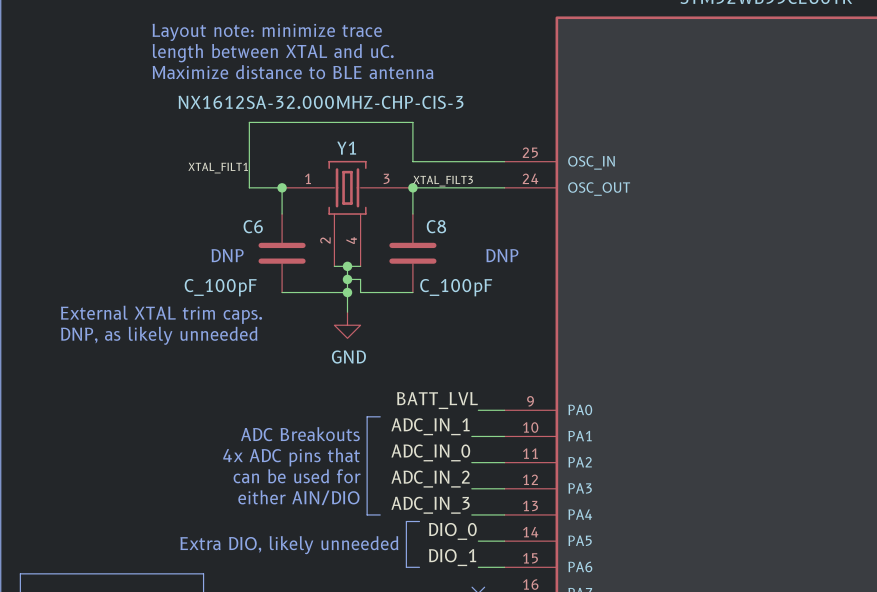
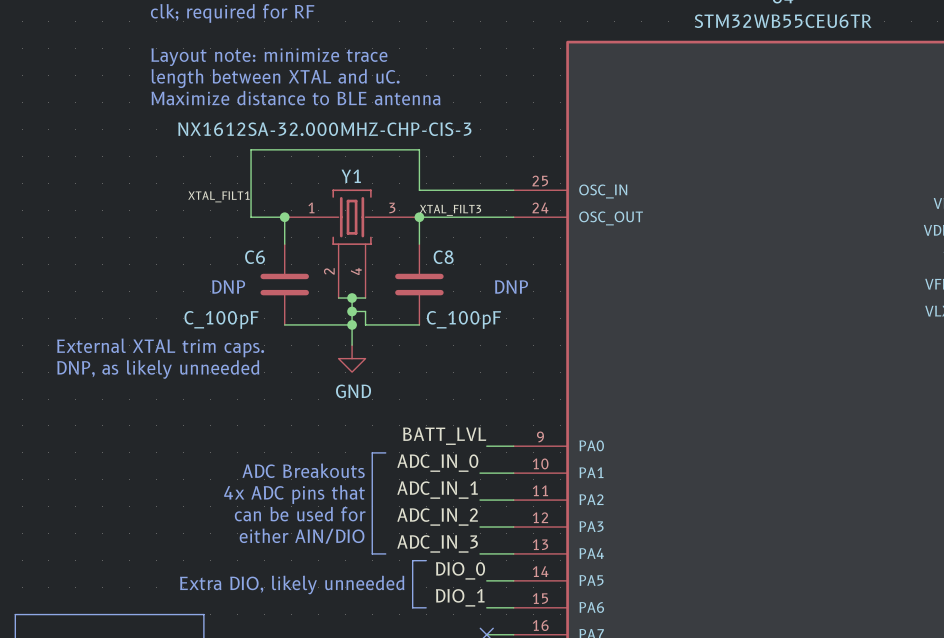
label: ADC_IN_1 (430, 426) -> ADC_IN_0 (437, 463)
label: ADC_IN_0 (430, 452) -> ADC_IN_1 (437, 490)

